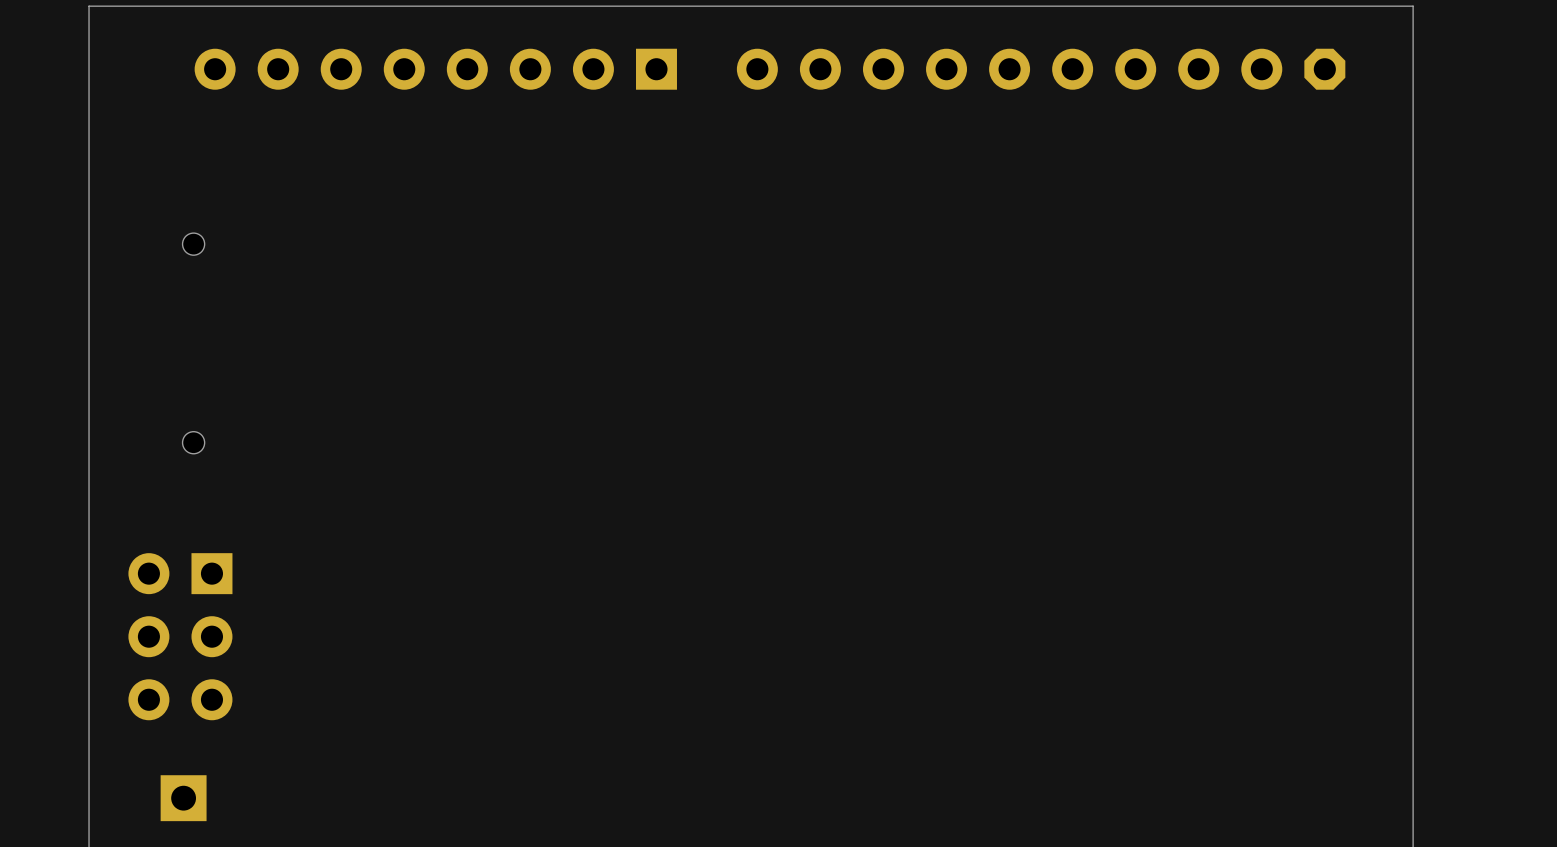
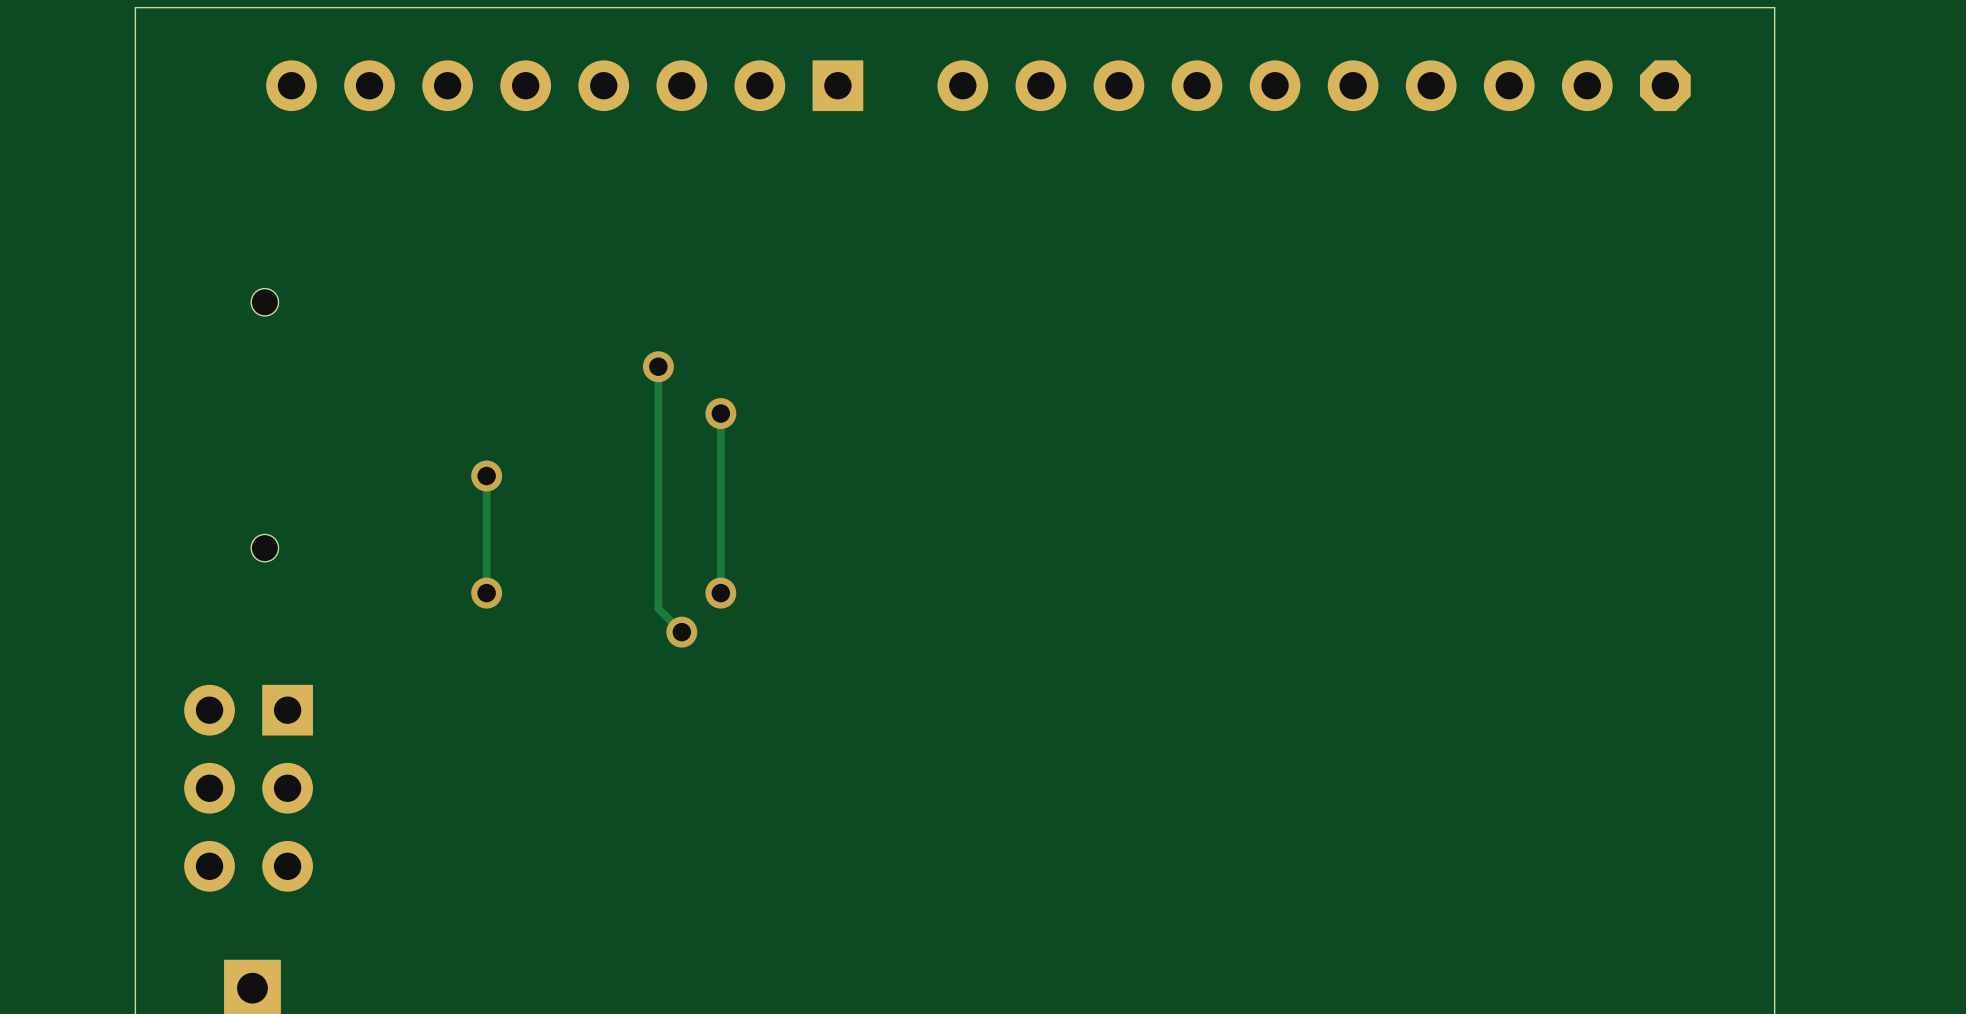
track: none -> (658, 366) (658, 608) (681, 632)
via: none -> (658, 366)
track: none -> (720, 413) (720, 593)
via: none -> (720, 413)
track: none -> (486, 476) (486, 593)
via: none -> (486, 476)
via: none -> (486, 593)
via: none -> (720, 593)
via: none -> (681, 632)

